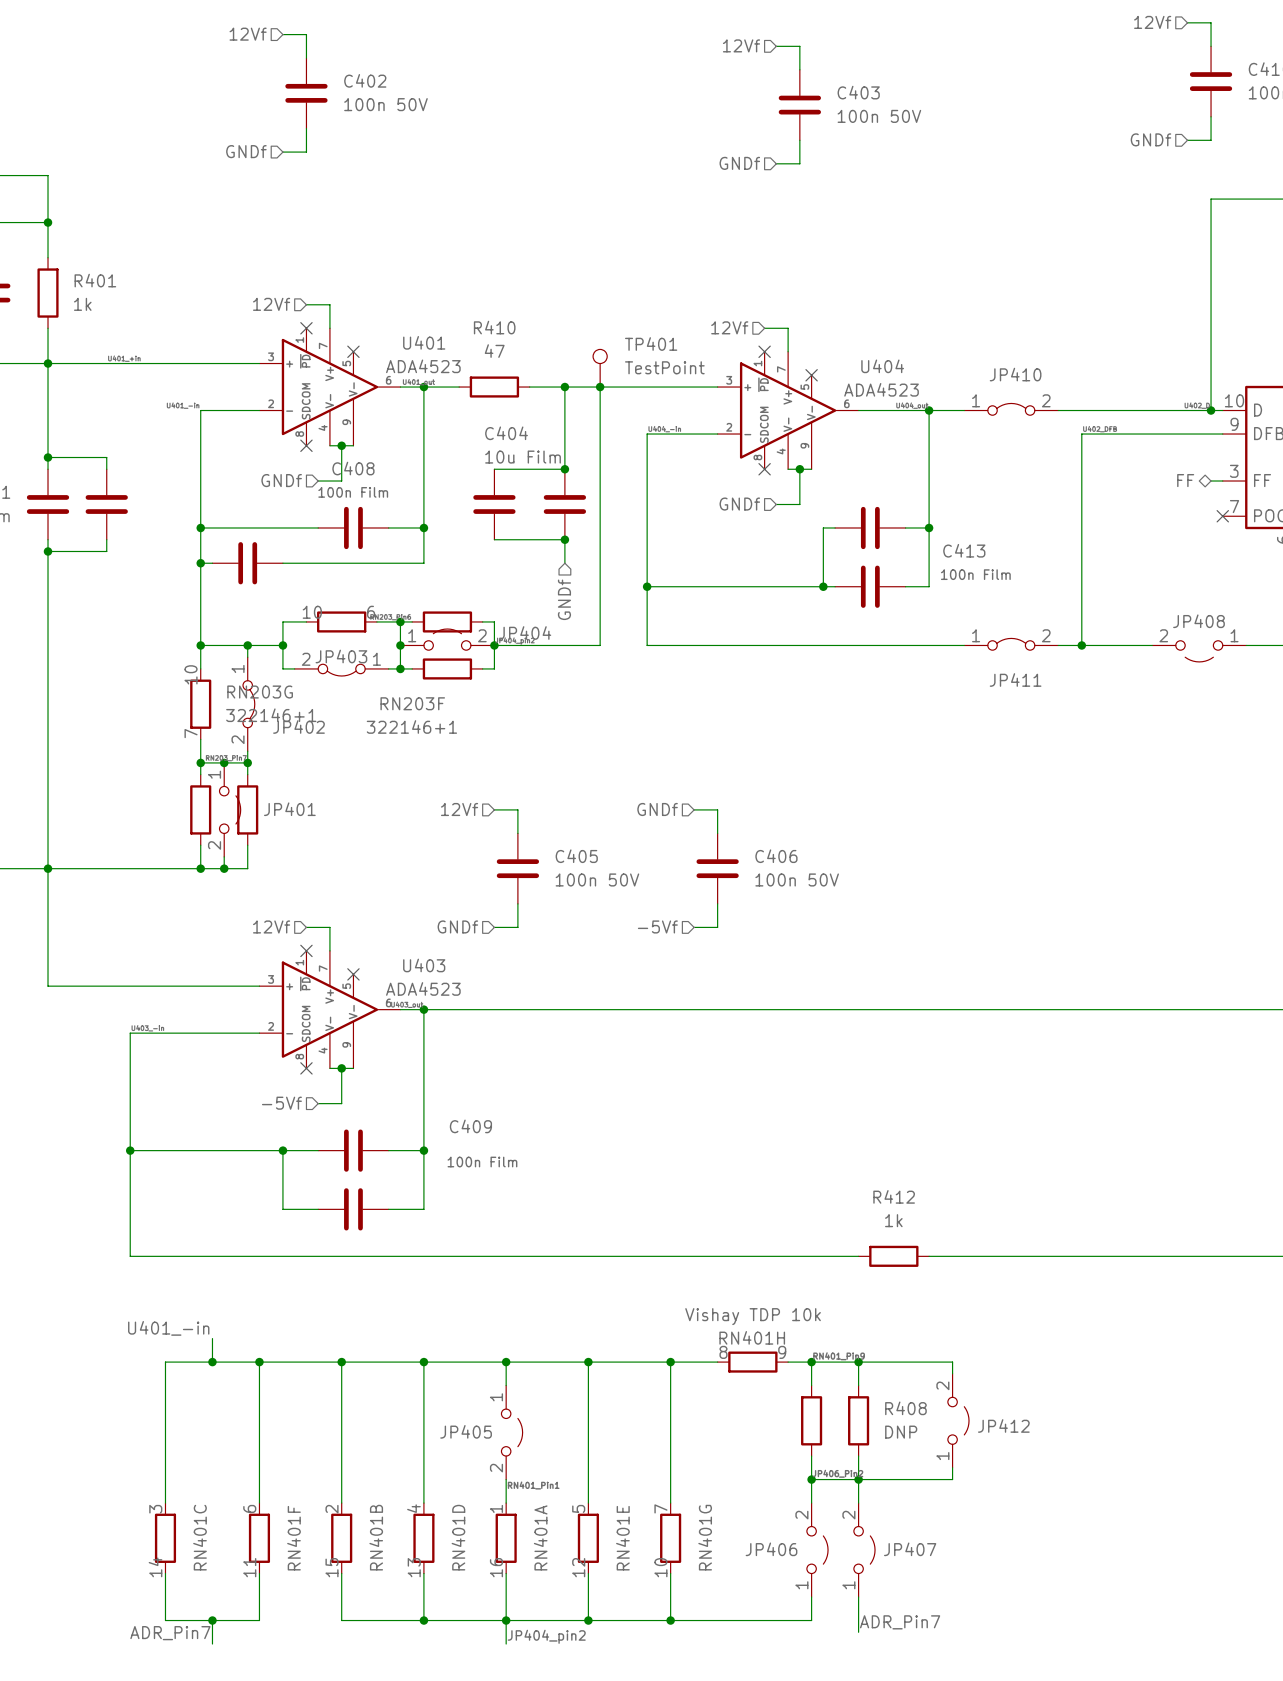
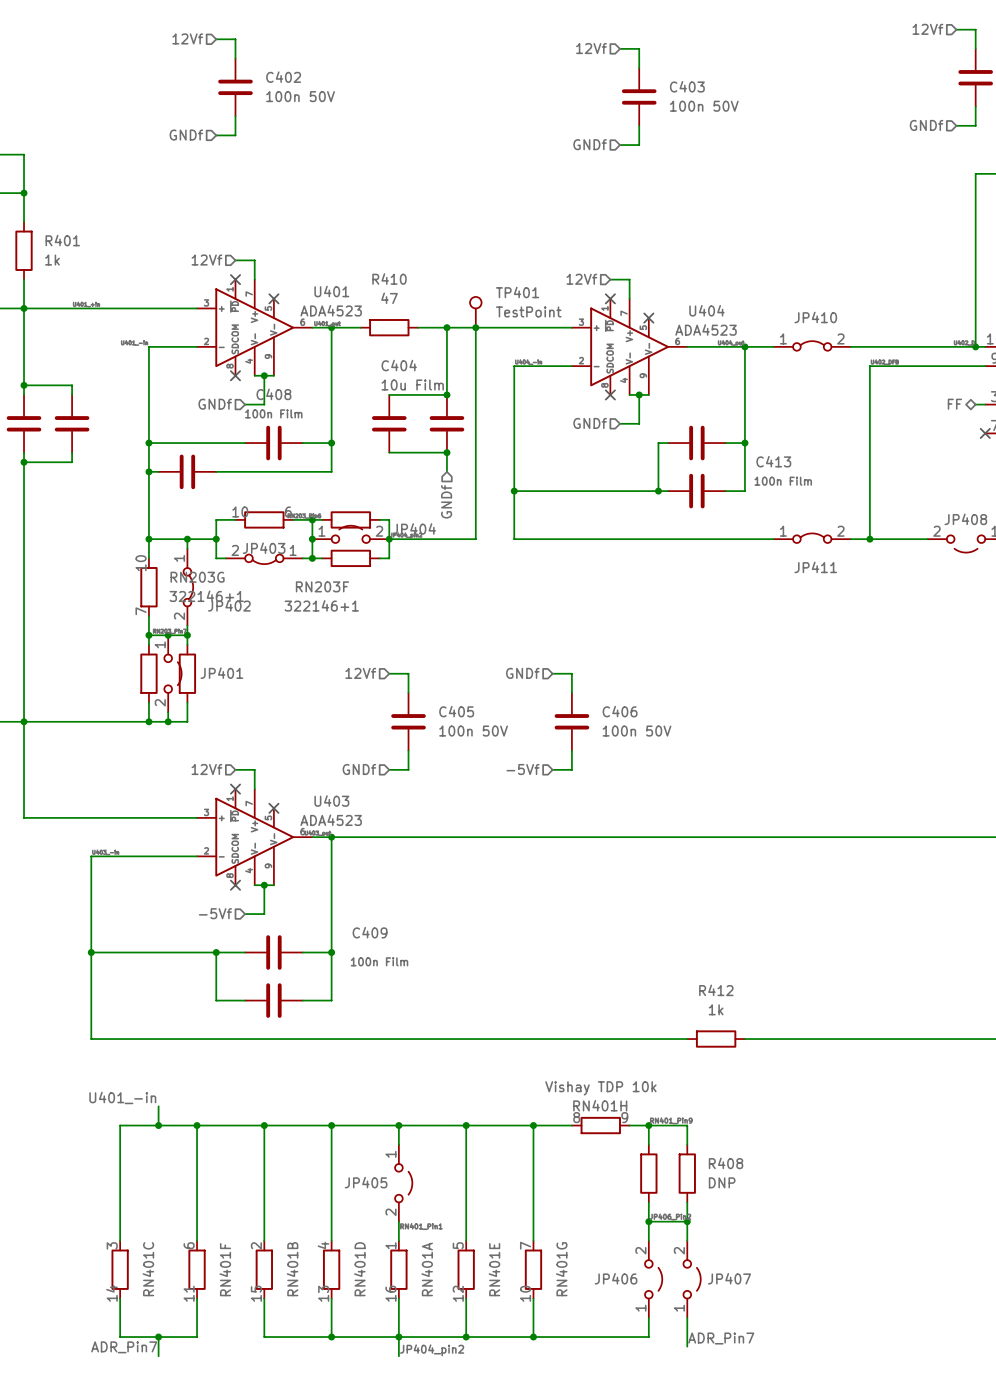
wire: (858, 1362) (952, 1362) (952, 1373) -> none
junction: (858, 1362) -> none
JP412: (958, 1420) -> none
wire: (952, 1467) (952, 1479) (858, 1479) -> none

